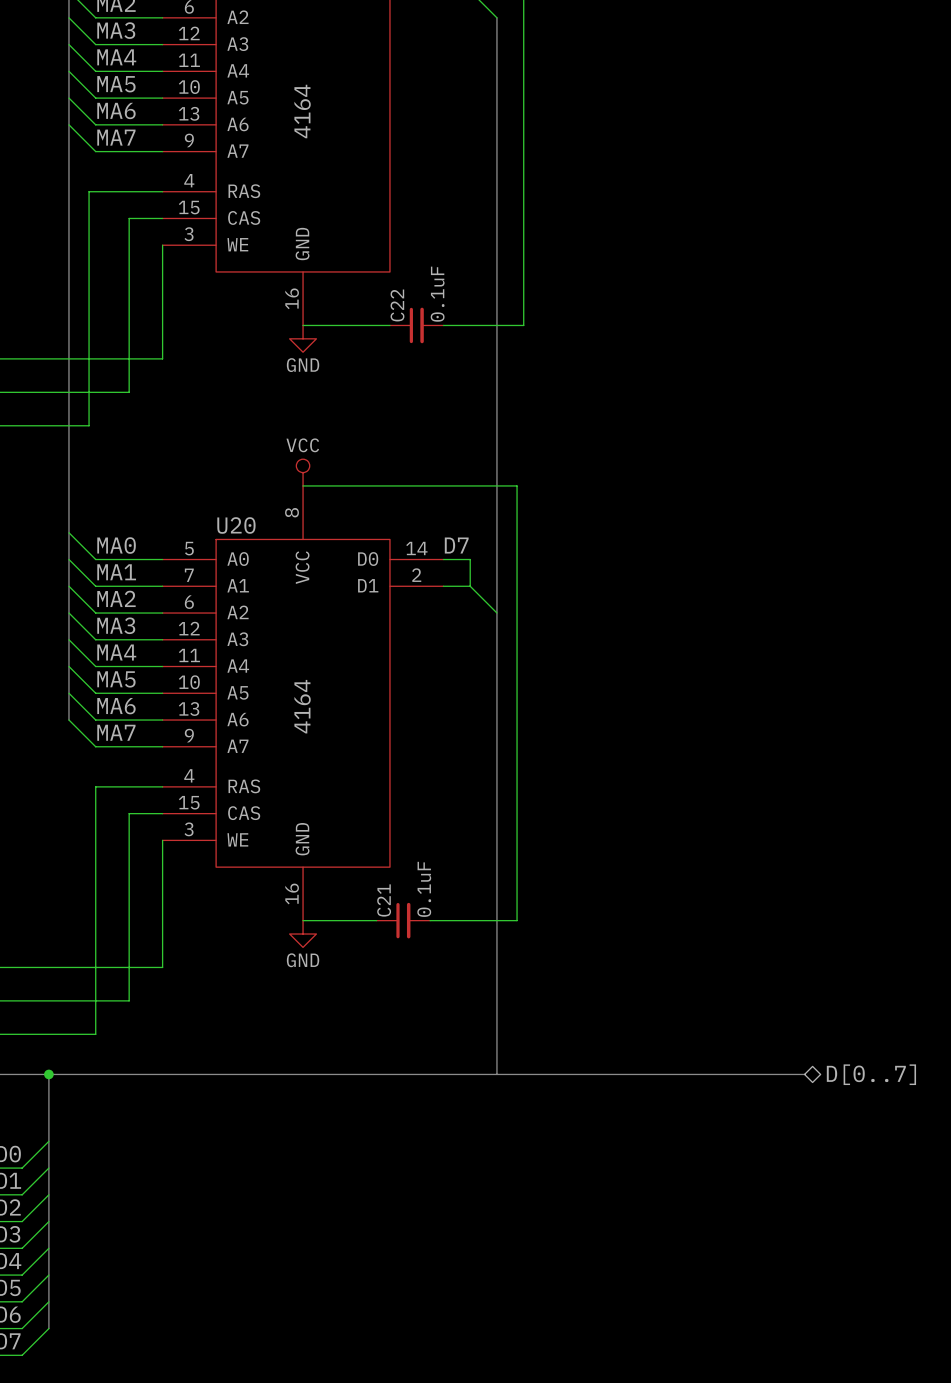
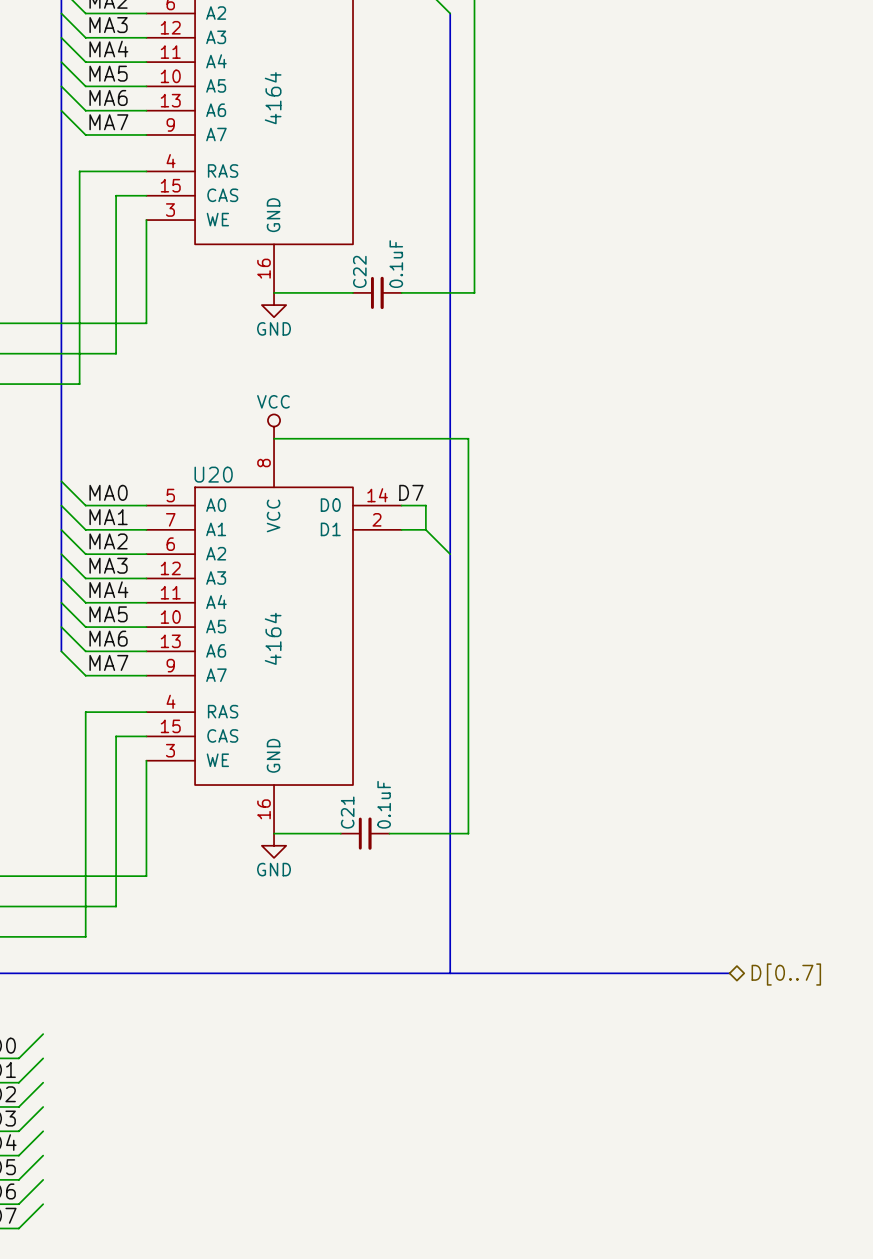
bus: (48, 1074) (48, 1328) -> none
junction: (48, 1074) -> none

